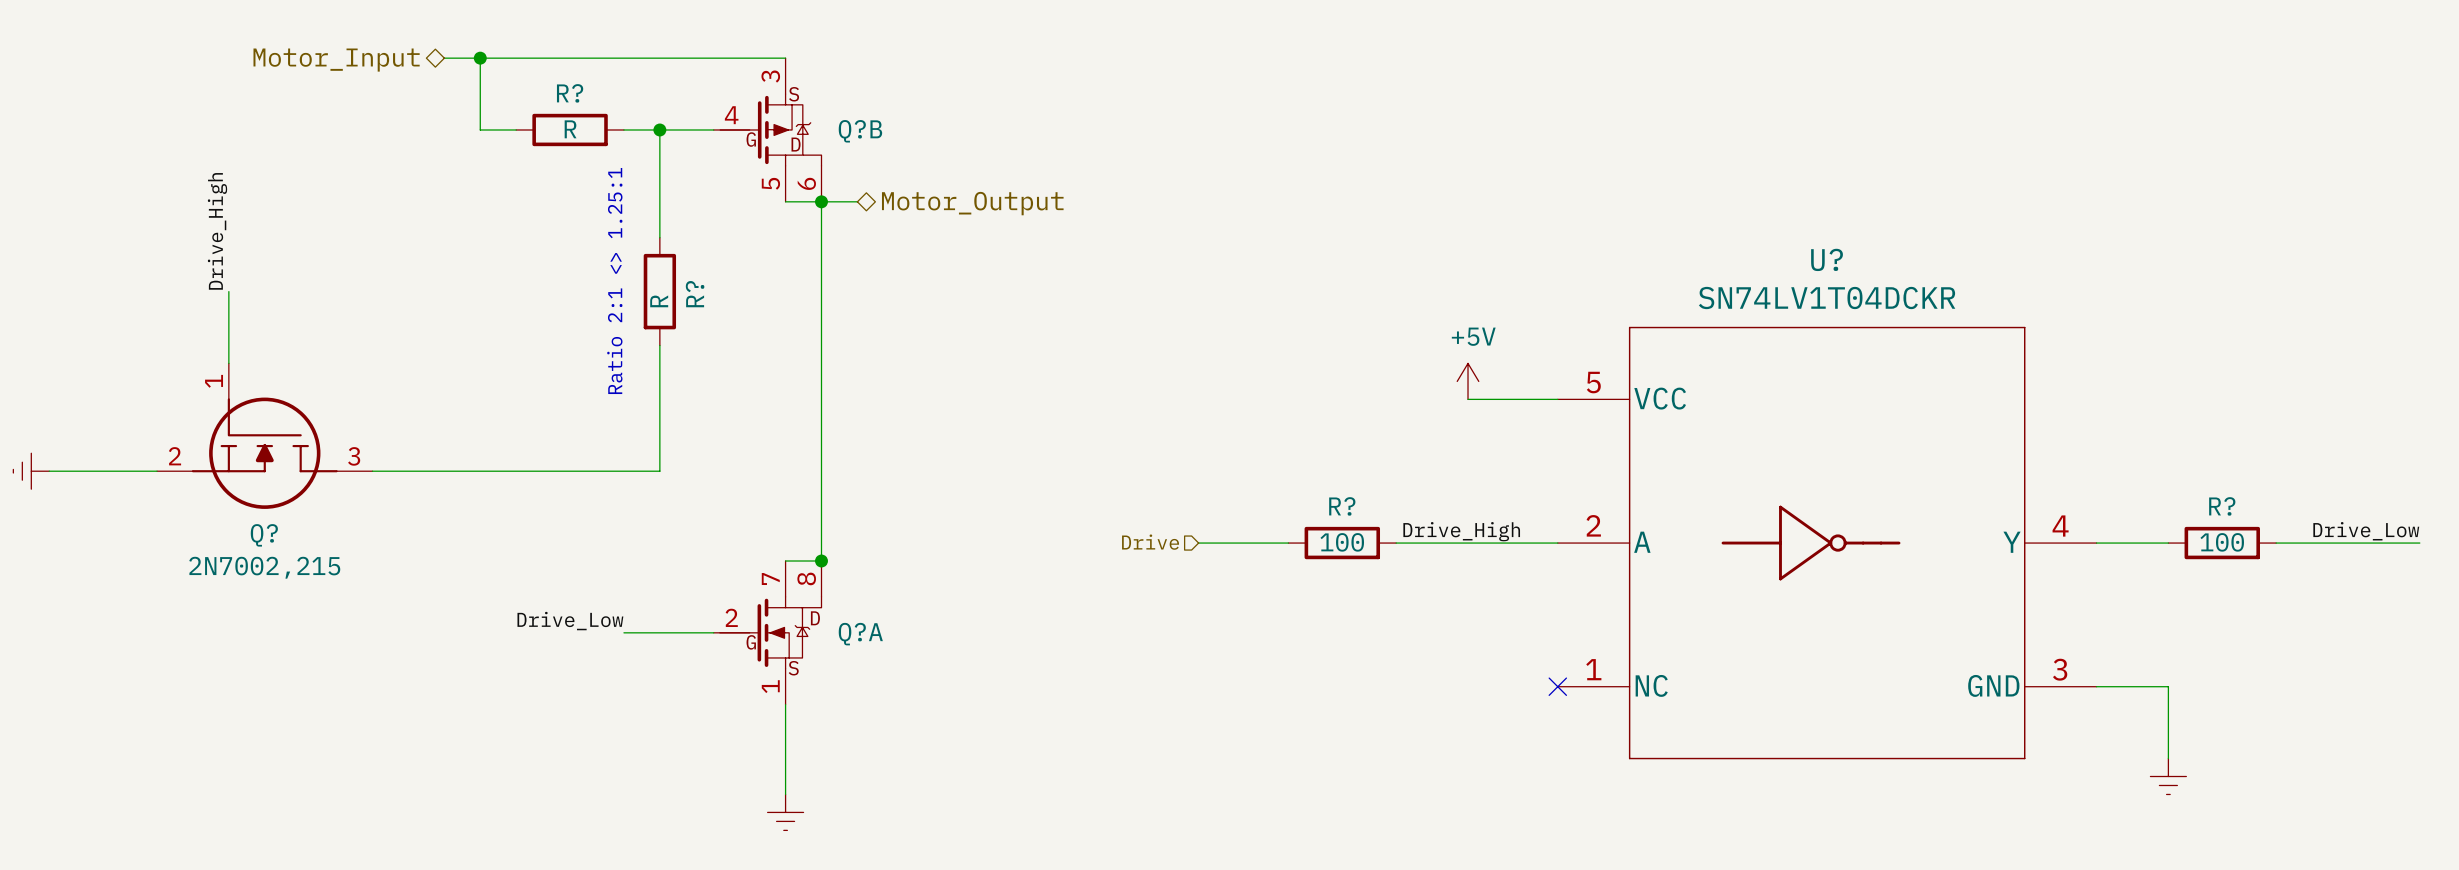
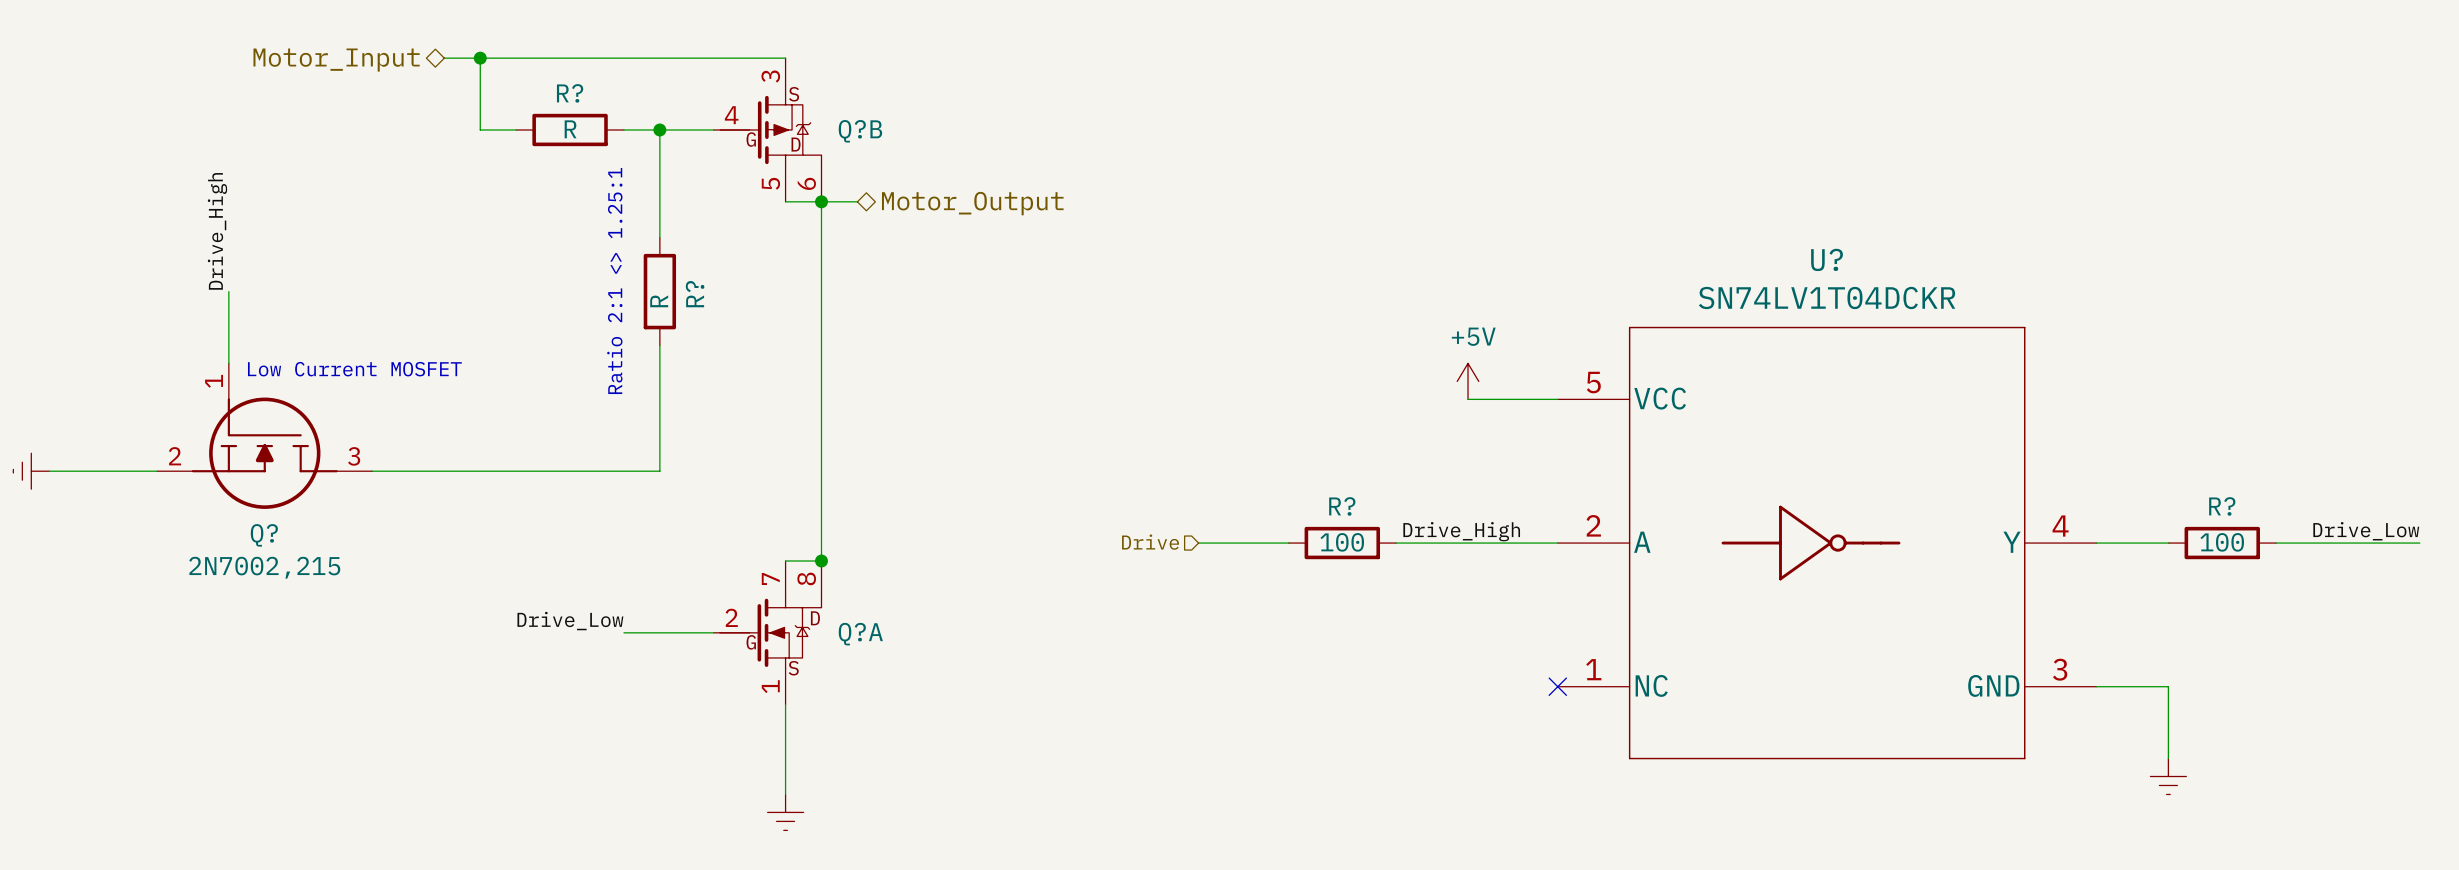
text: none -> Low Current MOSFET (354, 369)

